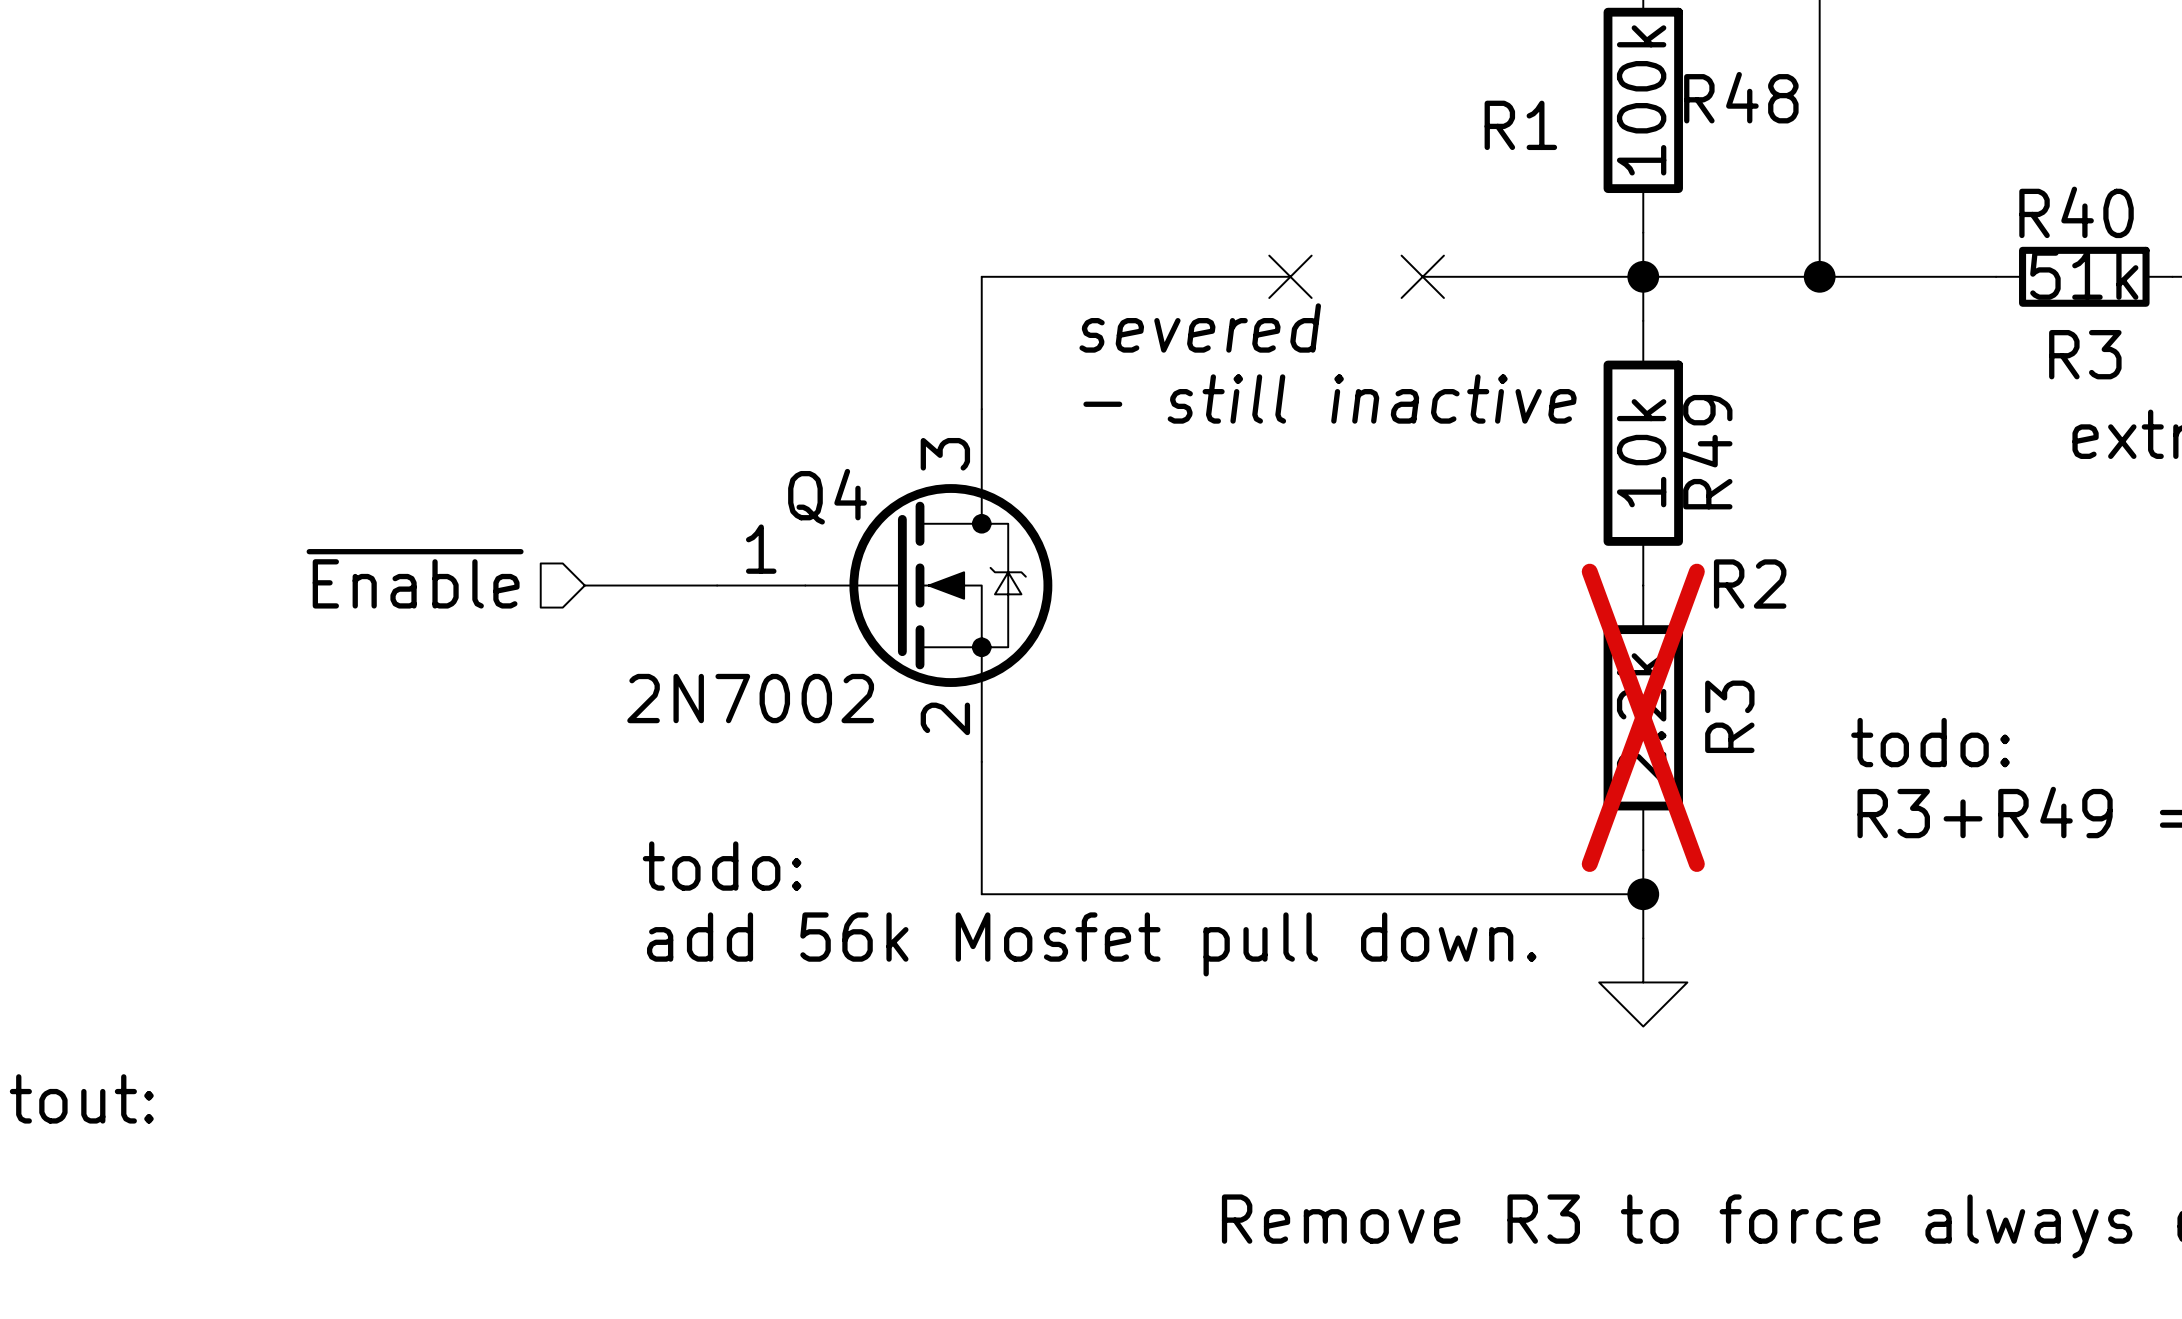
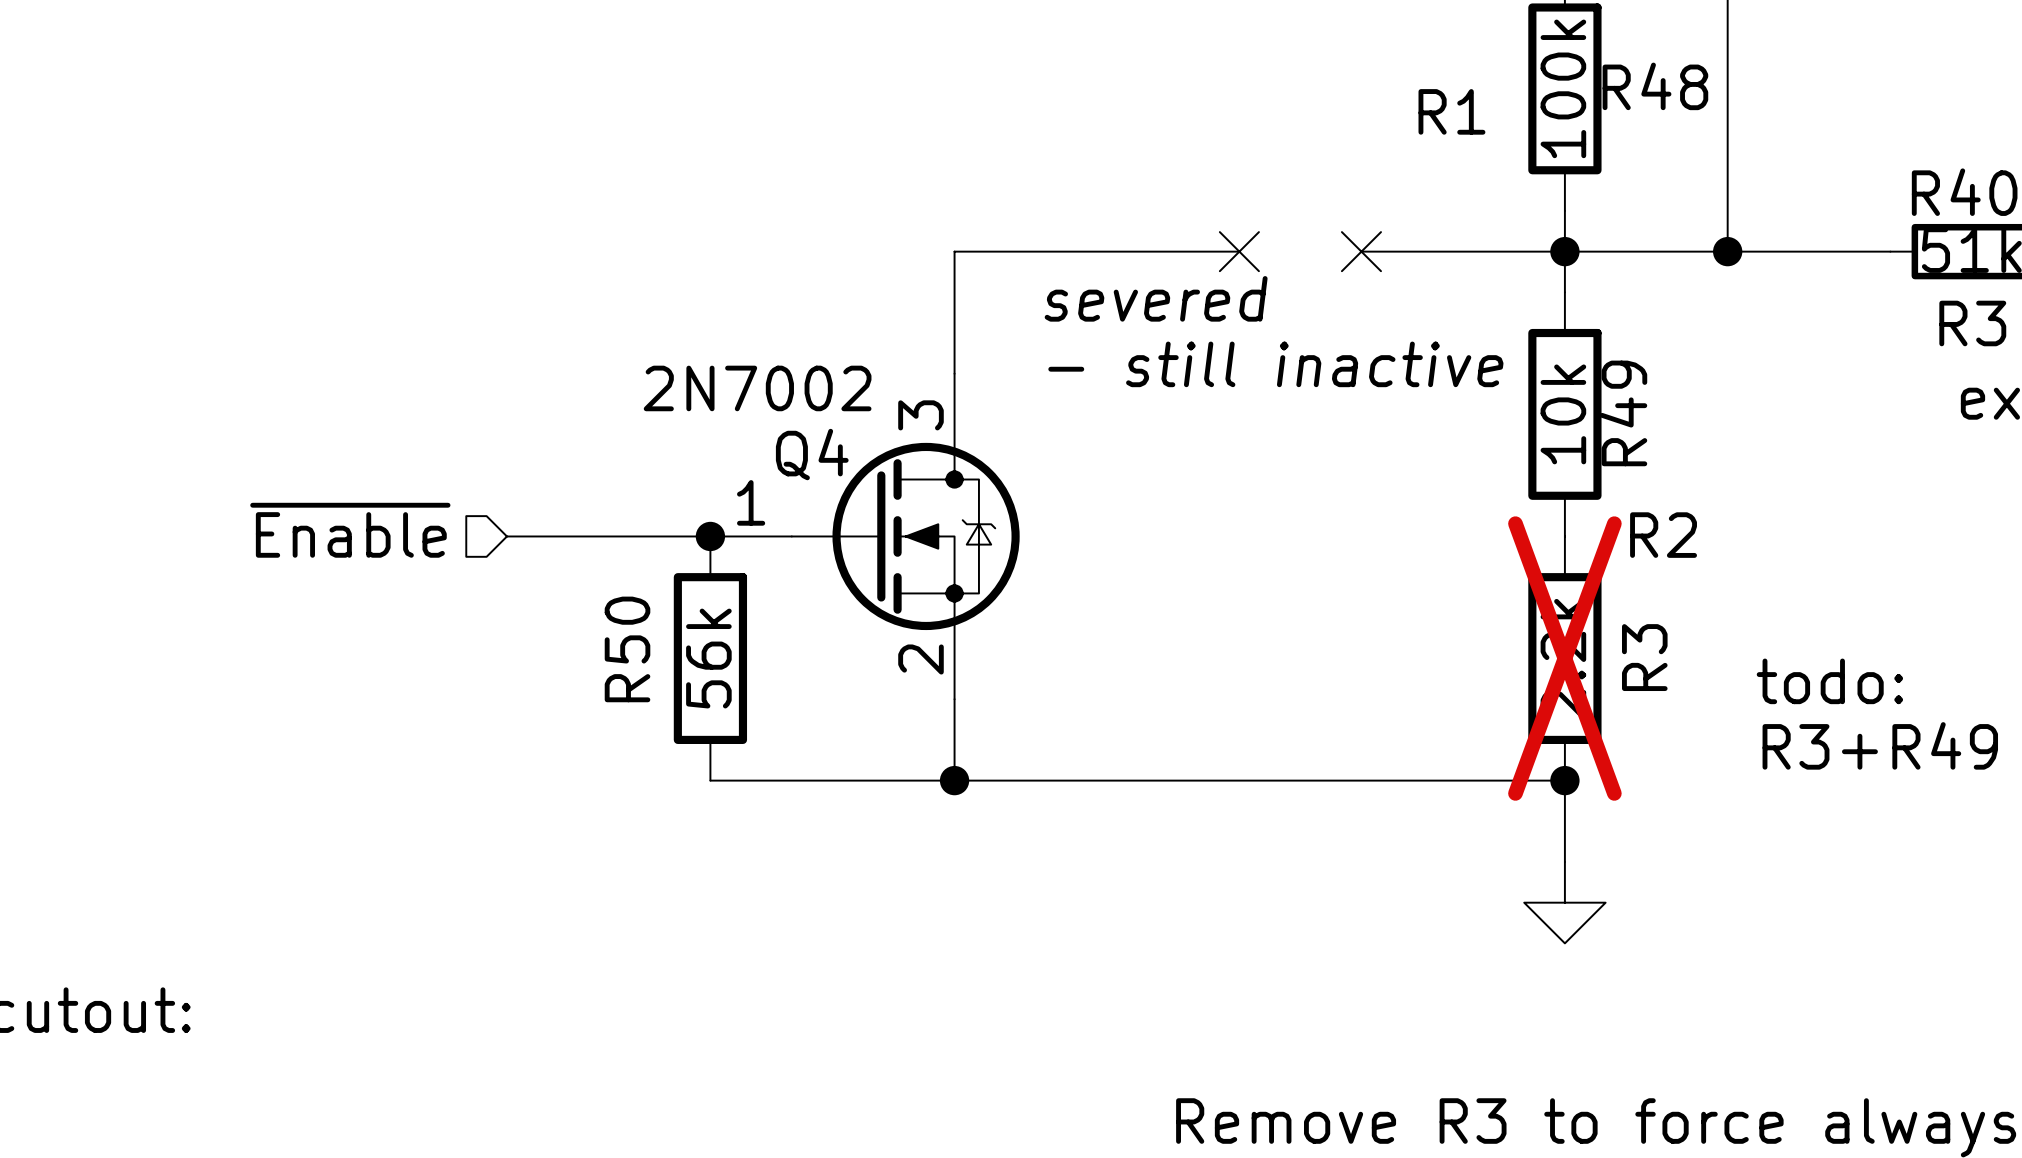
hierarchical label position: ~{Enable} (415, 578) -> ~{Enable} (350, 530)
wire: none -> (506, 536) (588, 536)
junction: none -> (710, 536)
Q4 value position: 2N7002 (750, 698) -> 2N7002 (757, 388)
R50: none -> 56k (710, 658)
wire: none -> (710, 780) (1564, 780)
wire: (981, 850) (981, 894) (1643, 894) -> none
junction: none -> (954, 780)
text: todo: (722, 866) -> none
junction position: (1643, 894) -> (1564, 780)
text: add 56k Mosfet pull down. (1091, 944) -> none

